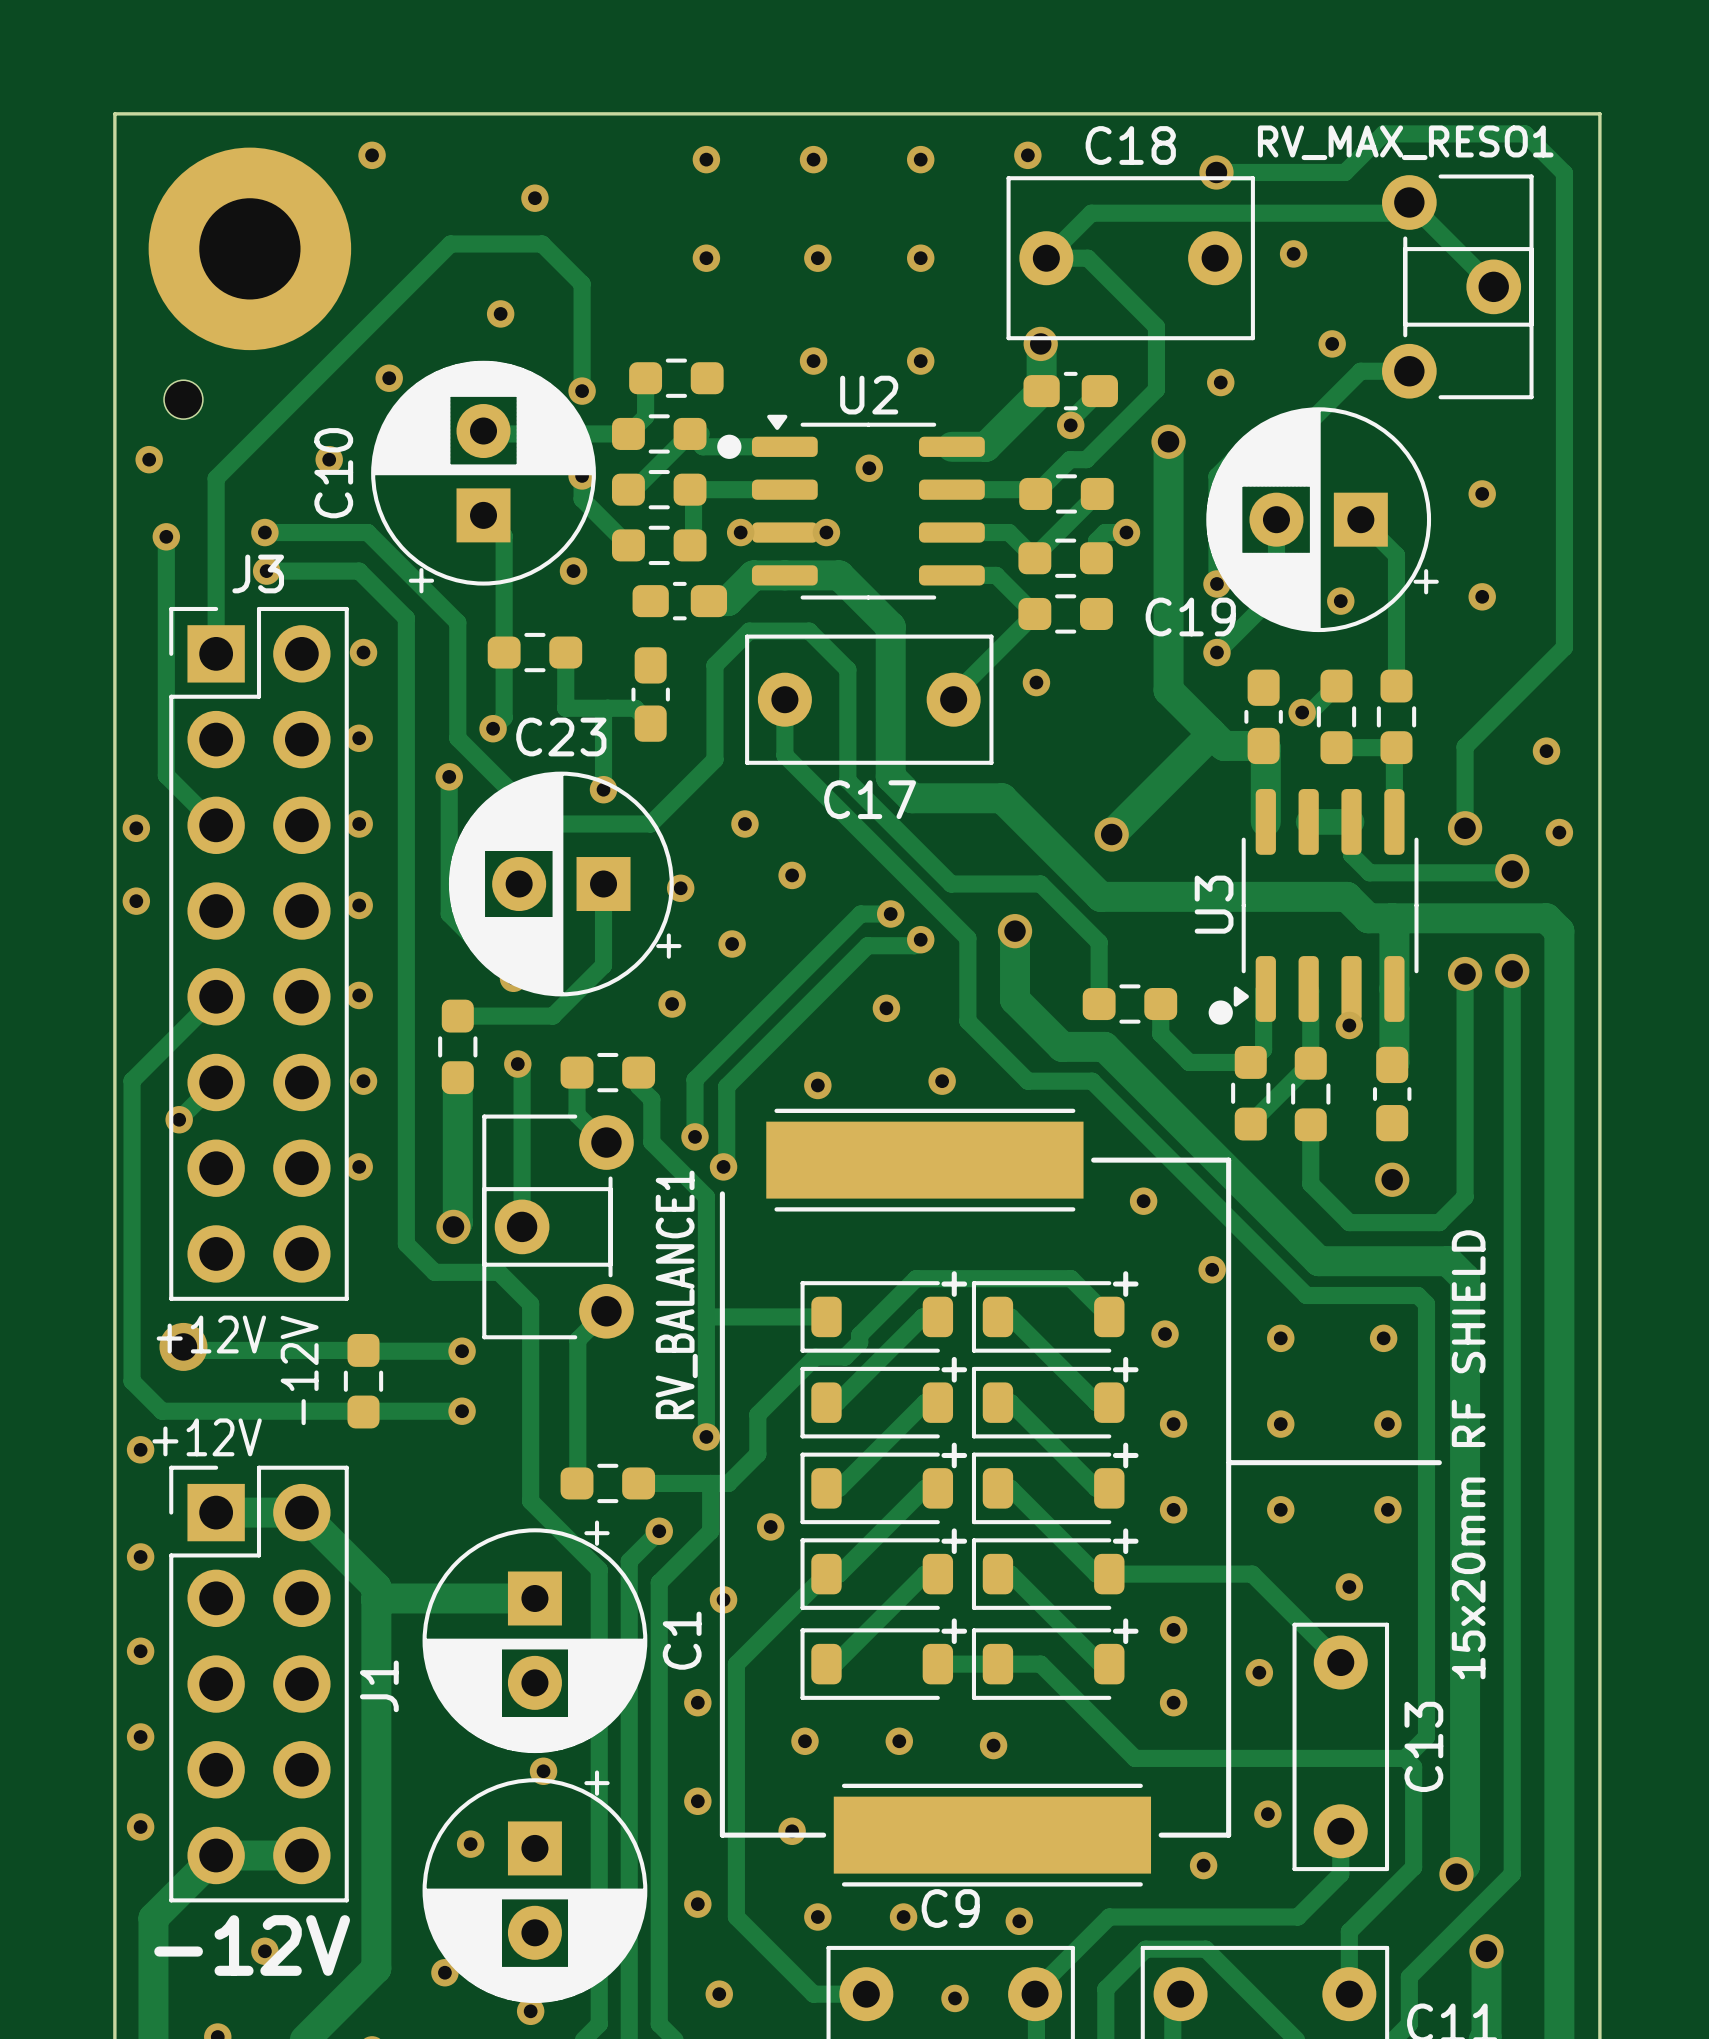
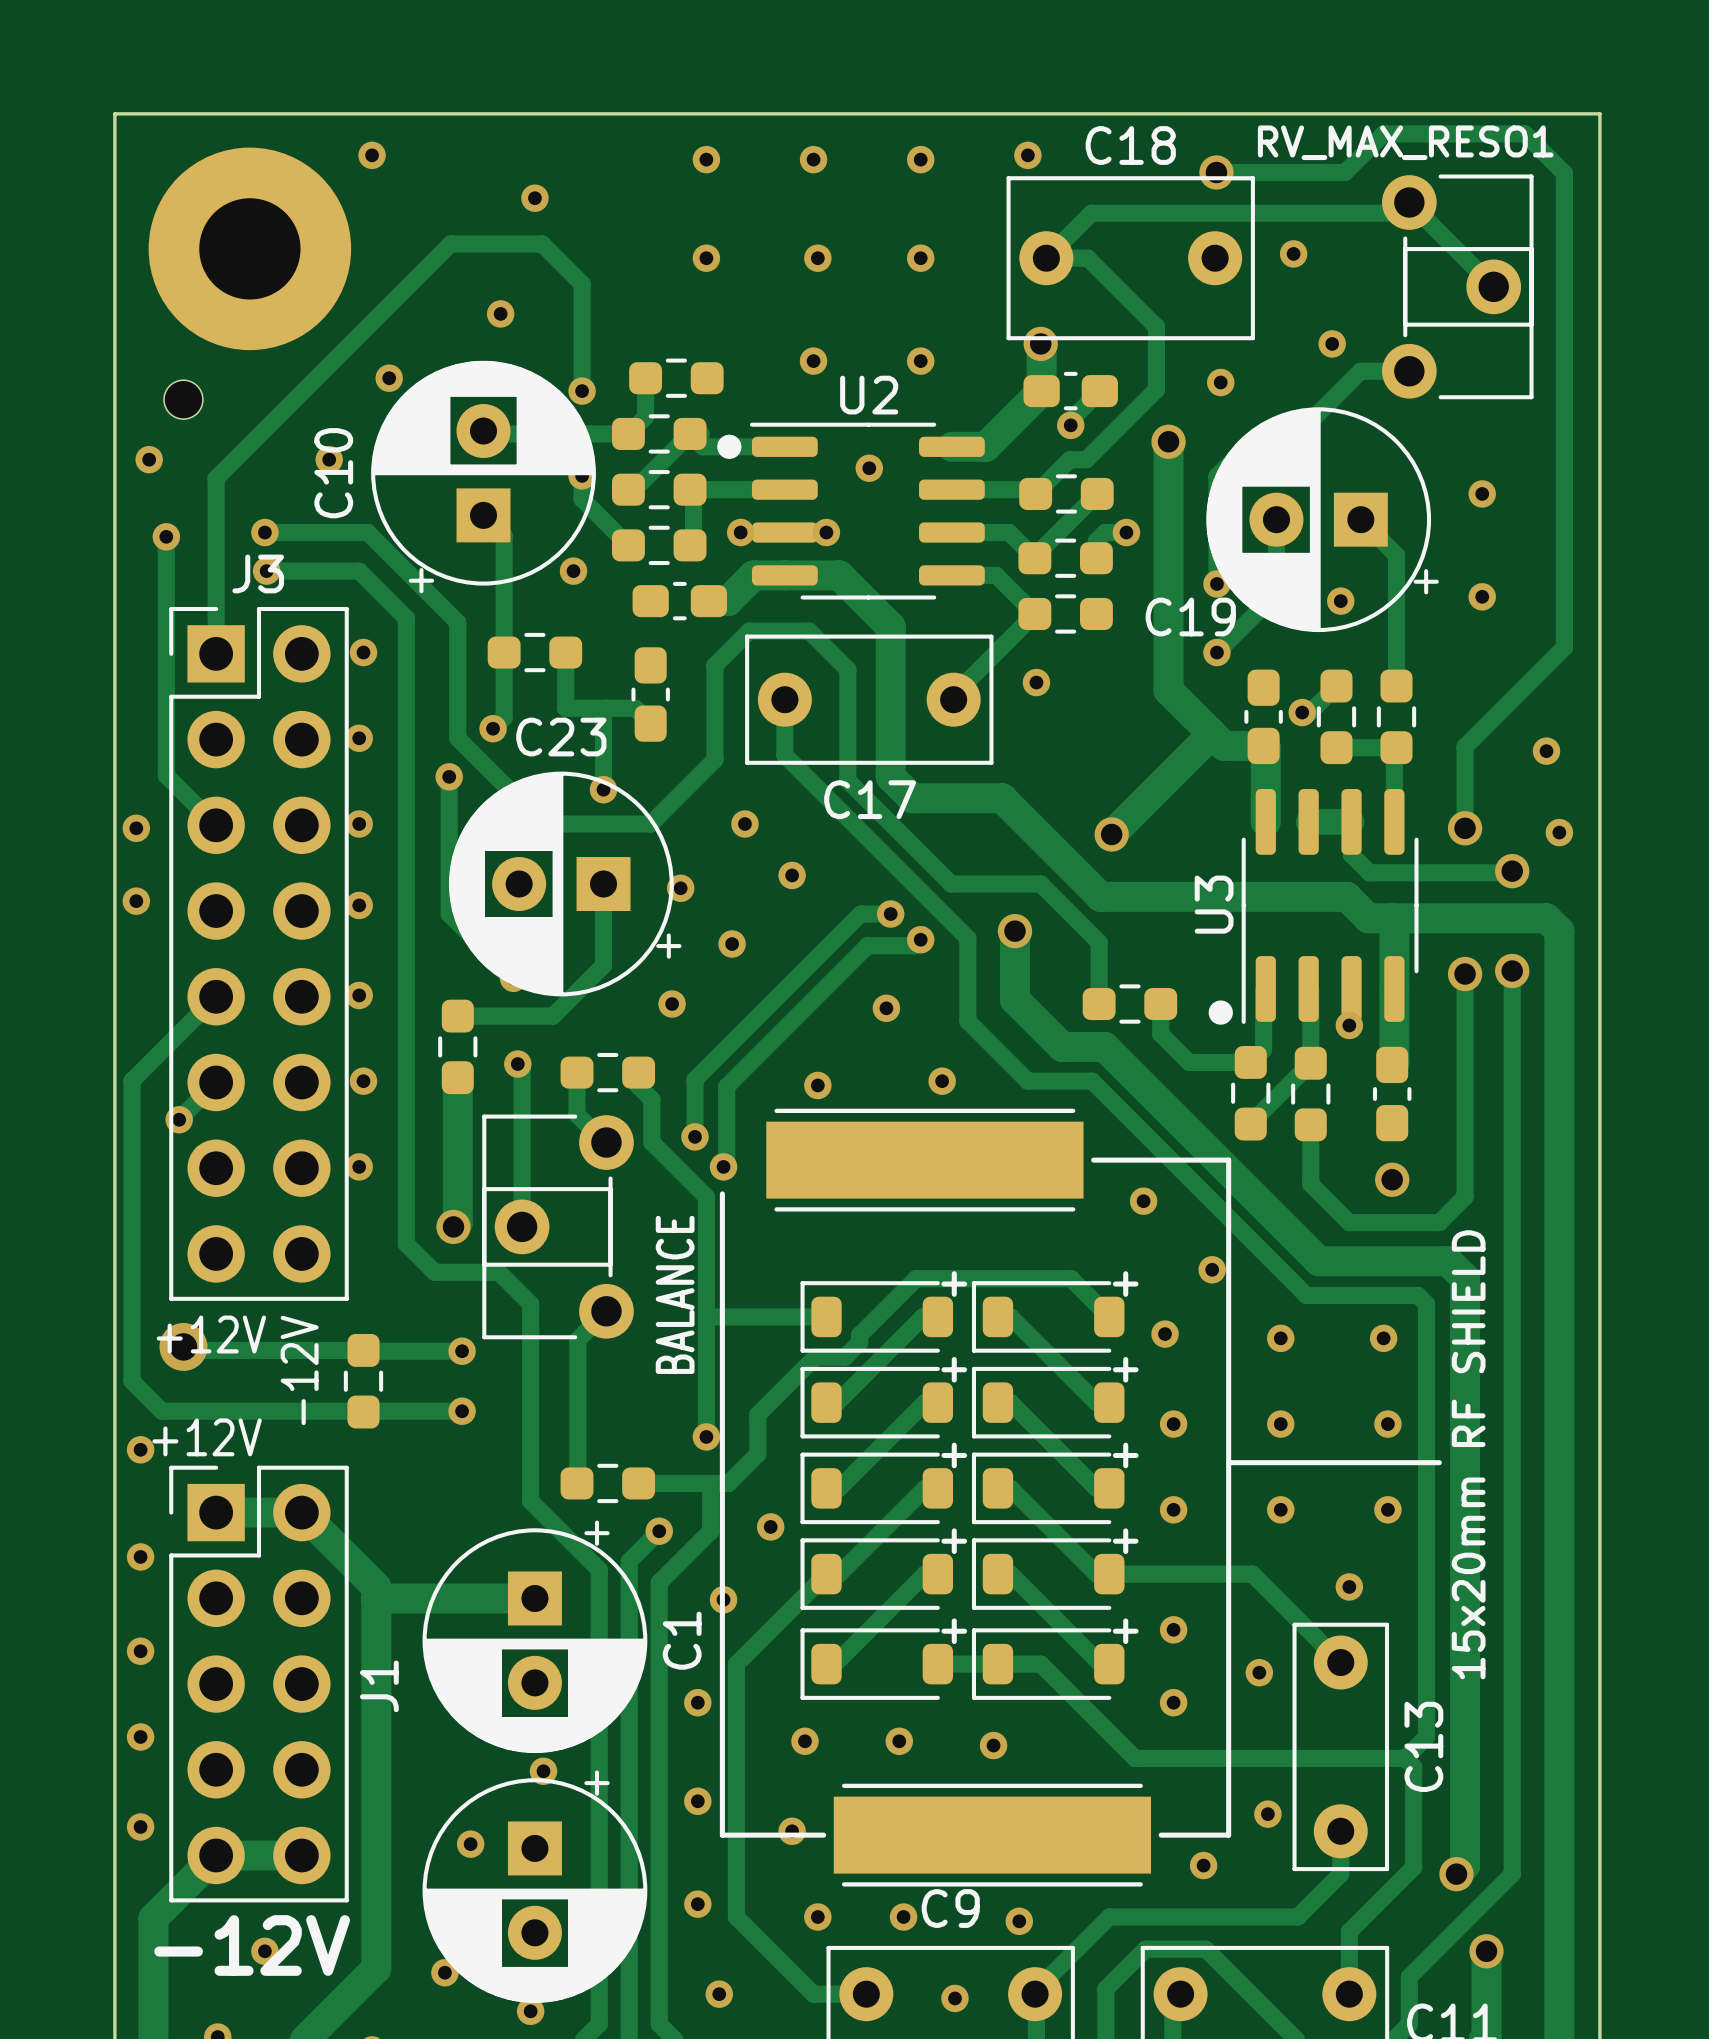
U2 footprint: [751, 414, 985, 600] -> [749, 422, 985, 600]
U3 footprint: [1233, 789, 1419, 1022] -> [1241, 789, 1419, 1024]
RV_BALANCE1 name: RV_BALANCE1 (676, 1294) -> BALANCE (675, 1294)

